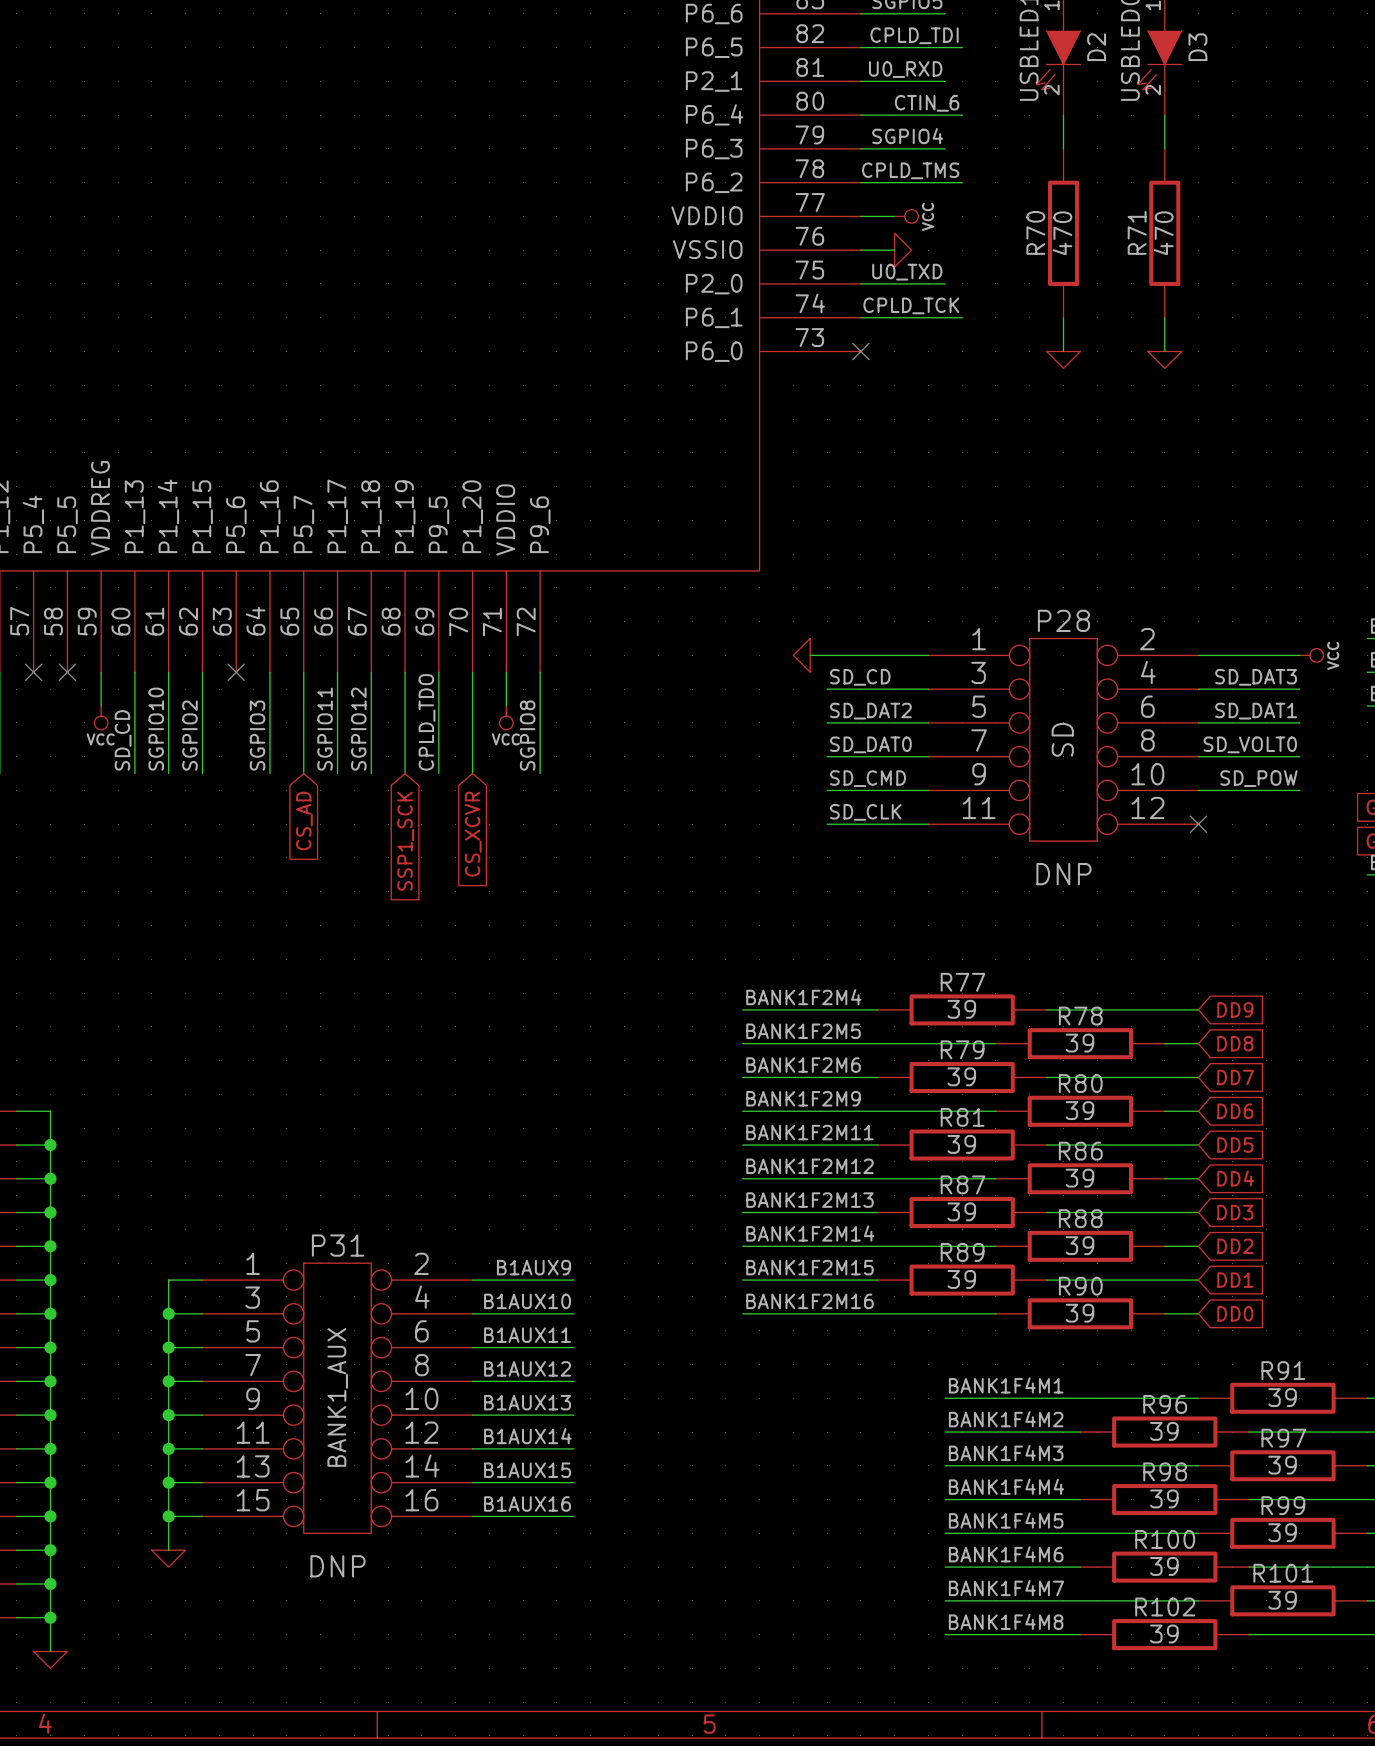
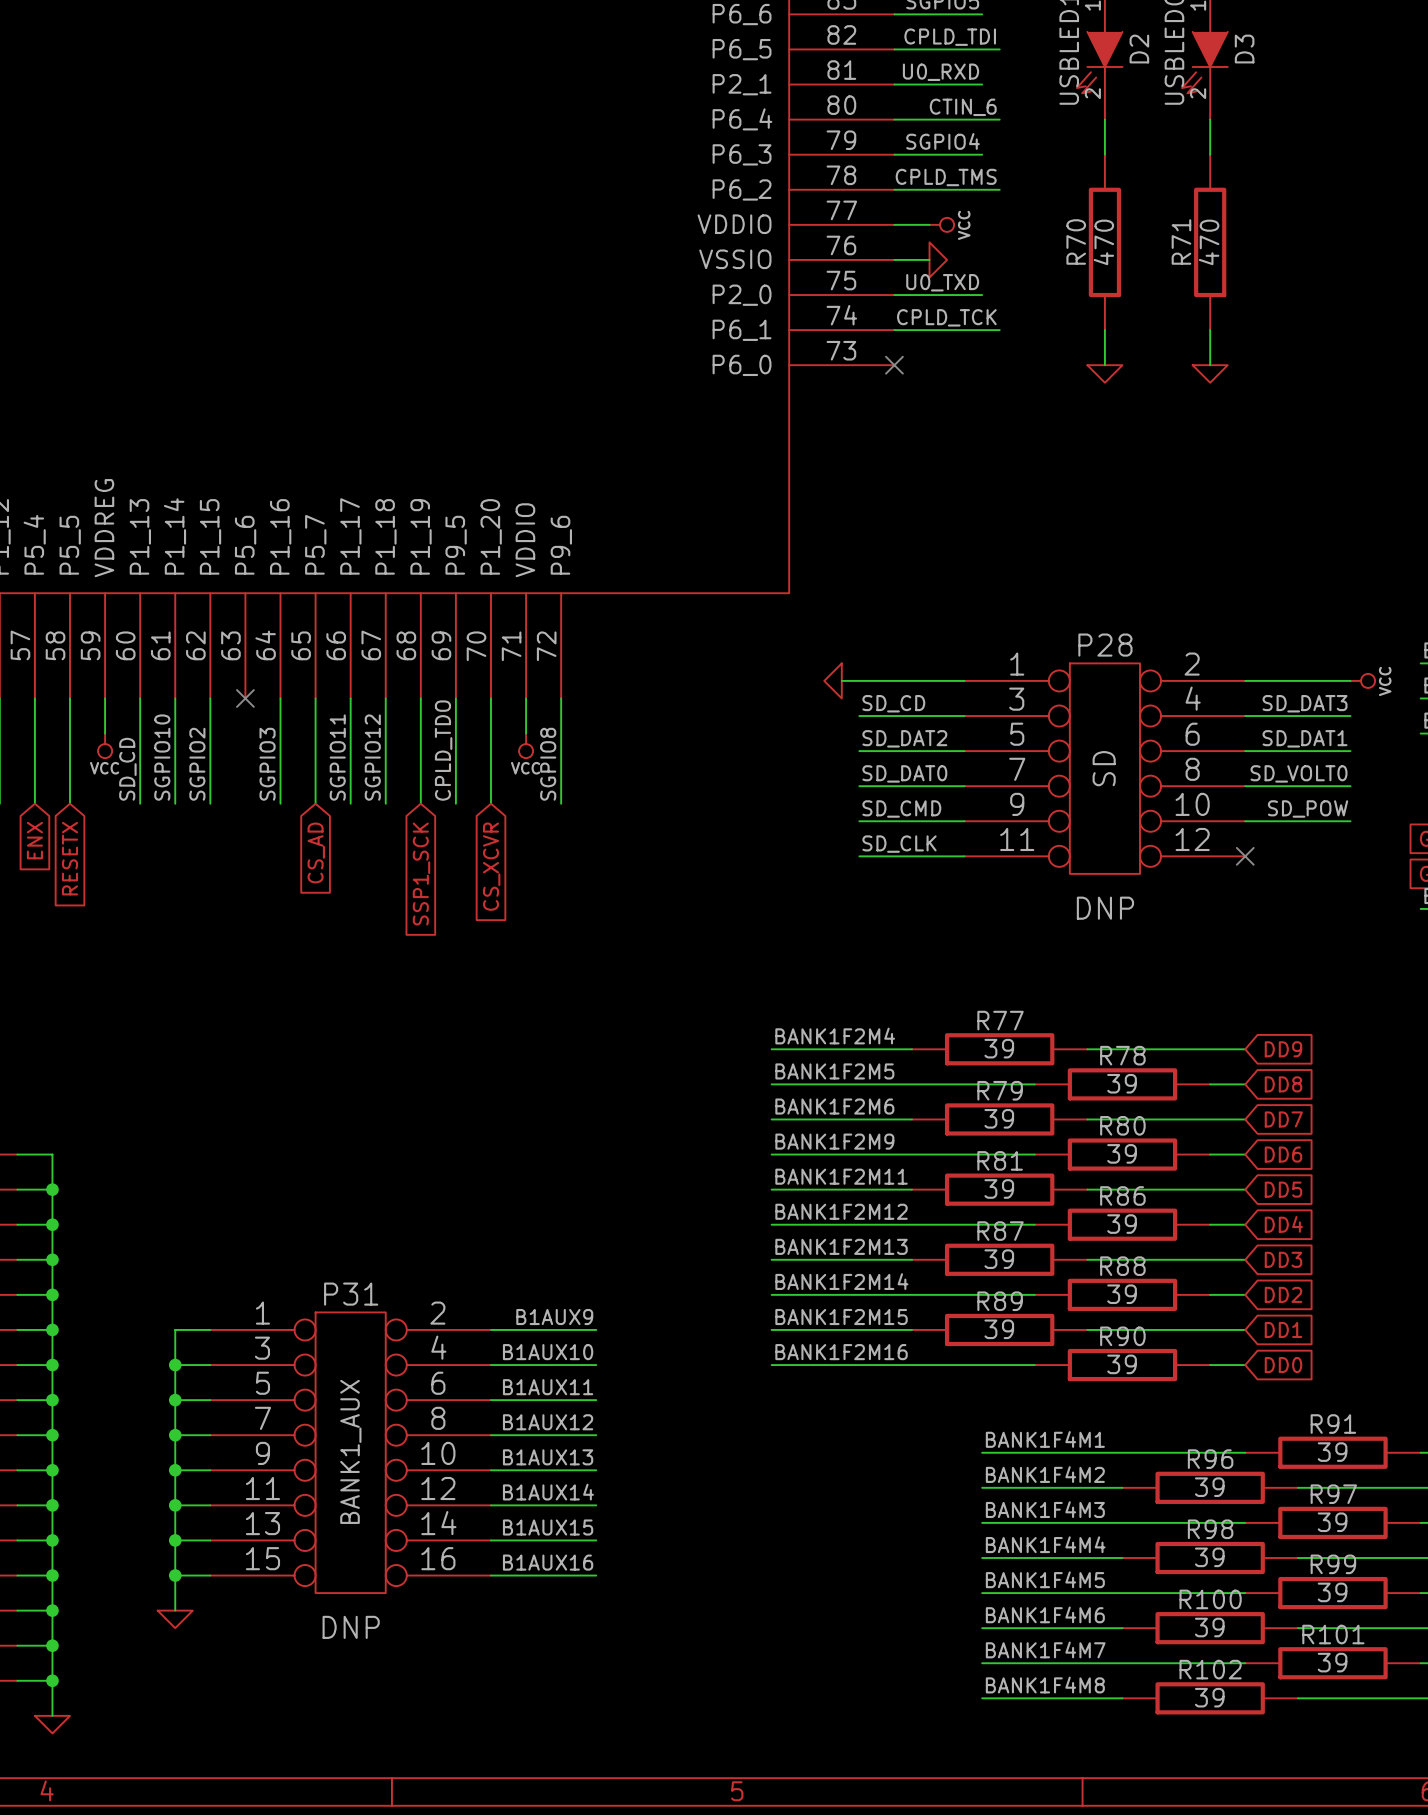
wire: none -> (34, 698) (34, 803)
no-connect mark: (33, 672) -> none
wire: none -> (70, 698) (70, 803)
no-connect mark: (67, 672) -> none
global label: none -> ENX (34, 840)
global label: none -> RESETX (70, 858)

